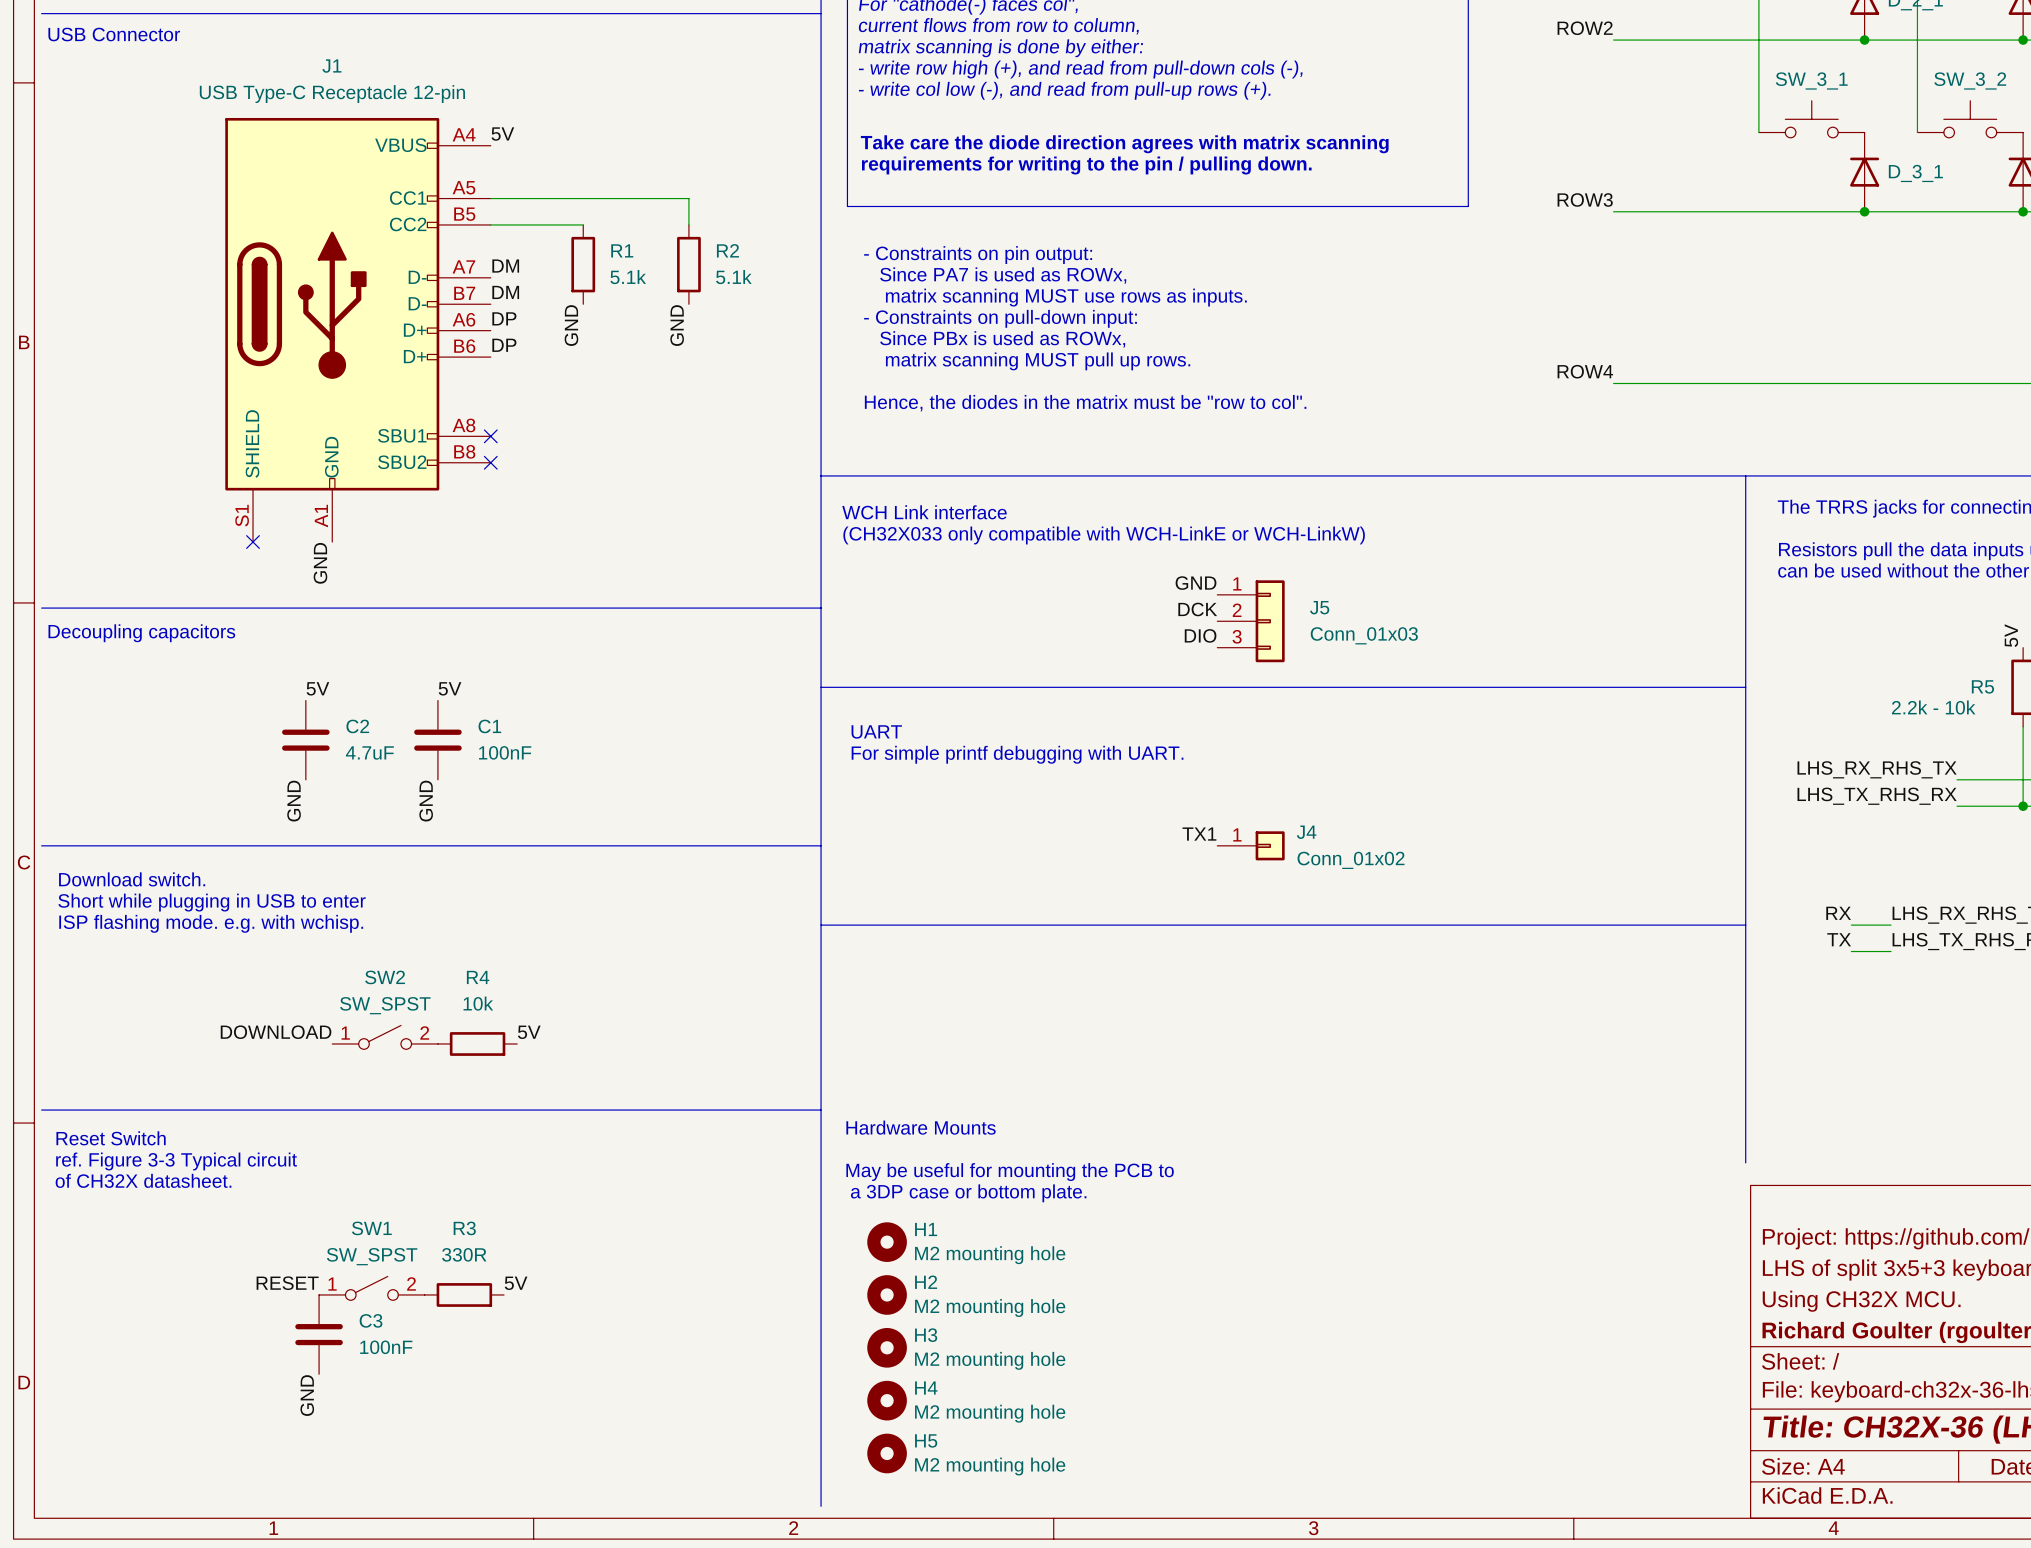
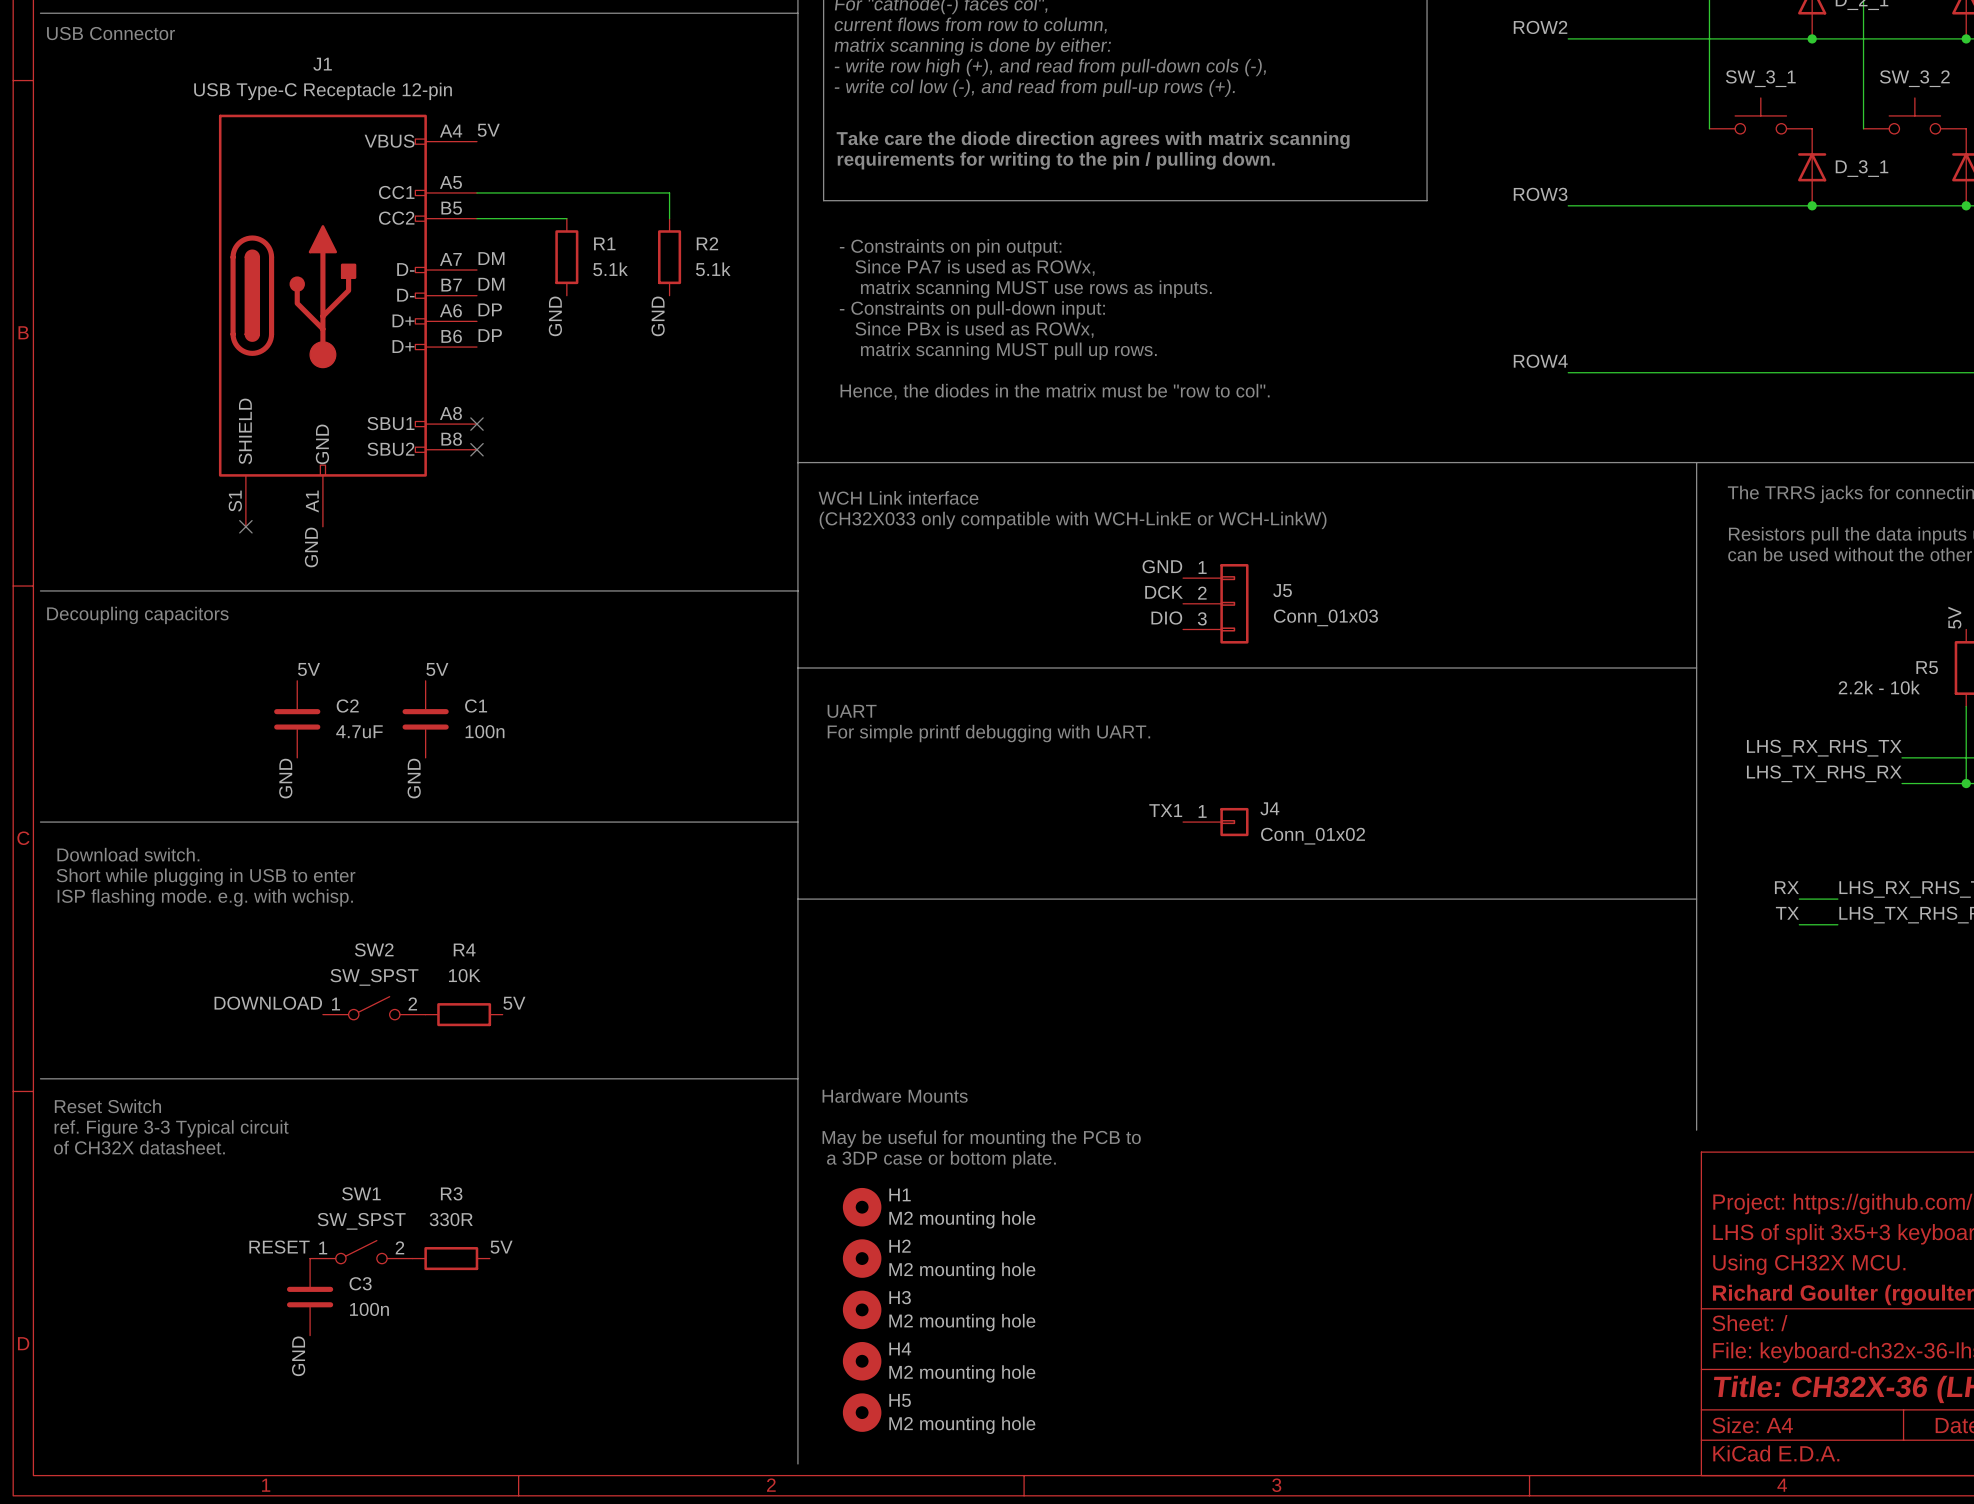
C1 value: 100nF (505, 752) -> 100n (485, 731)
R4 value: 10k (478, 1003) -> 10K (464, 975)
C3 value: 100nF (386, 1347) -> 100n (369, 1309)

